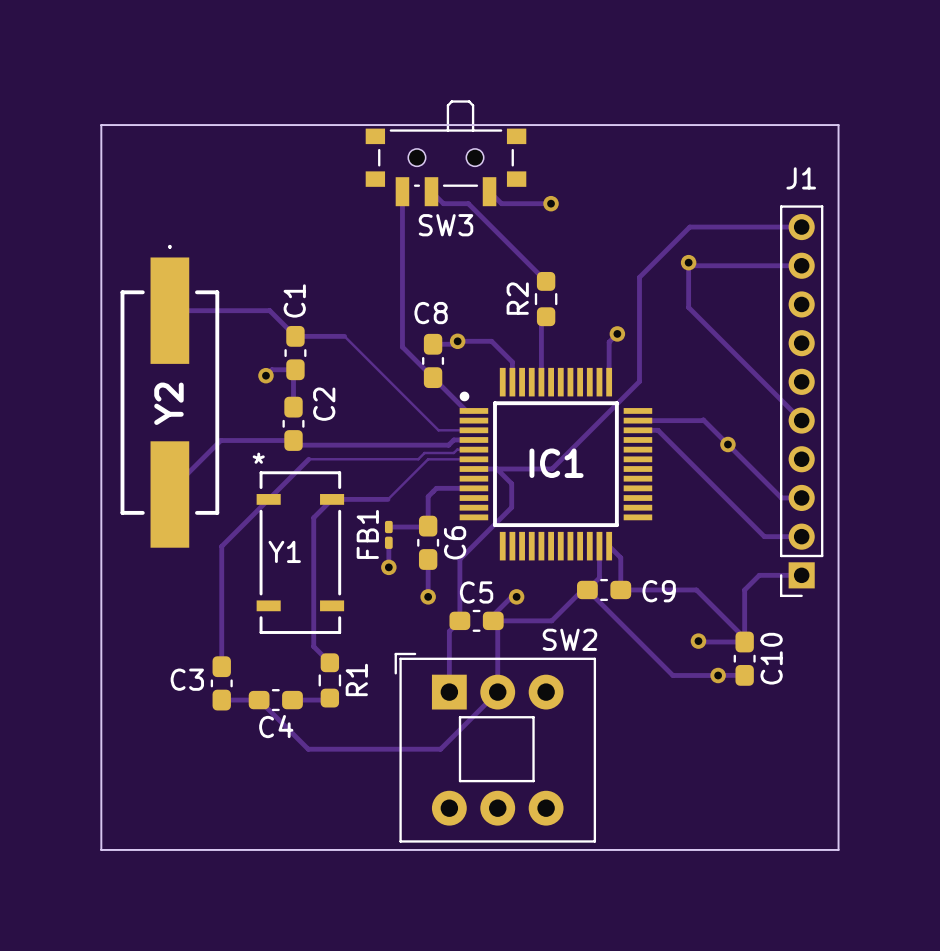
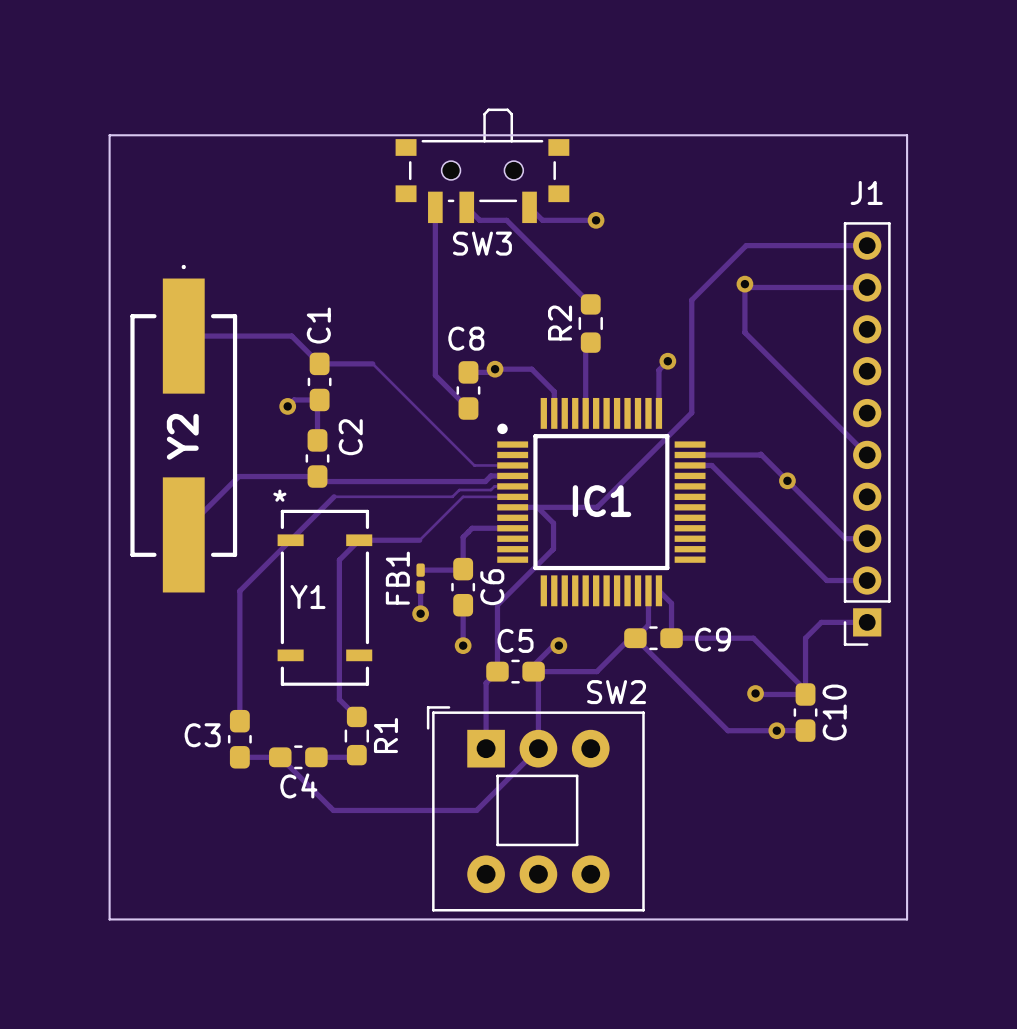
track: (433, 377) (466, 410) (473, 410) -> none

